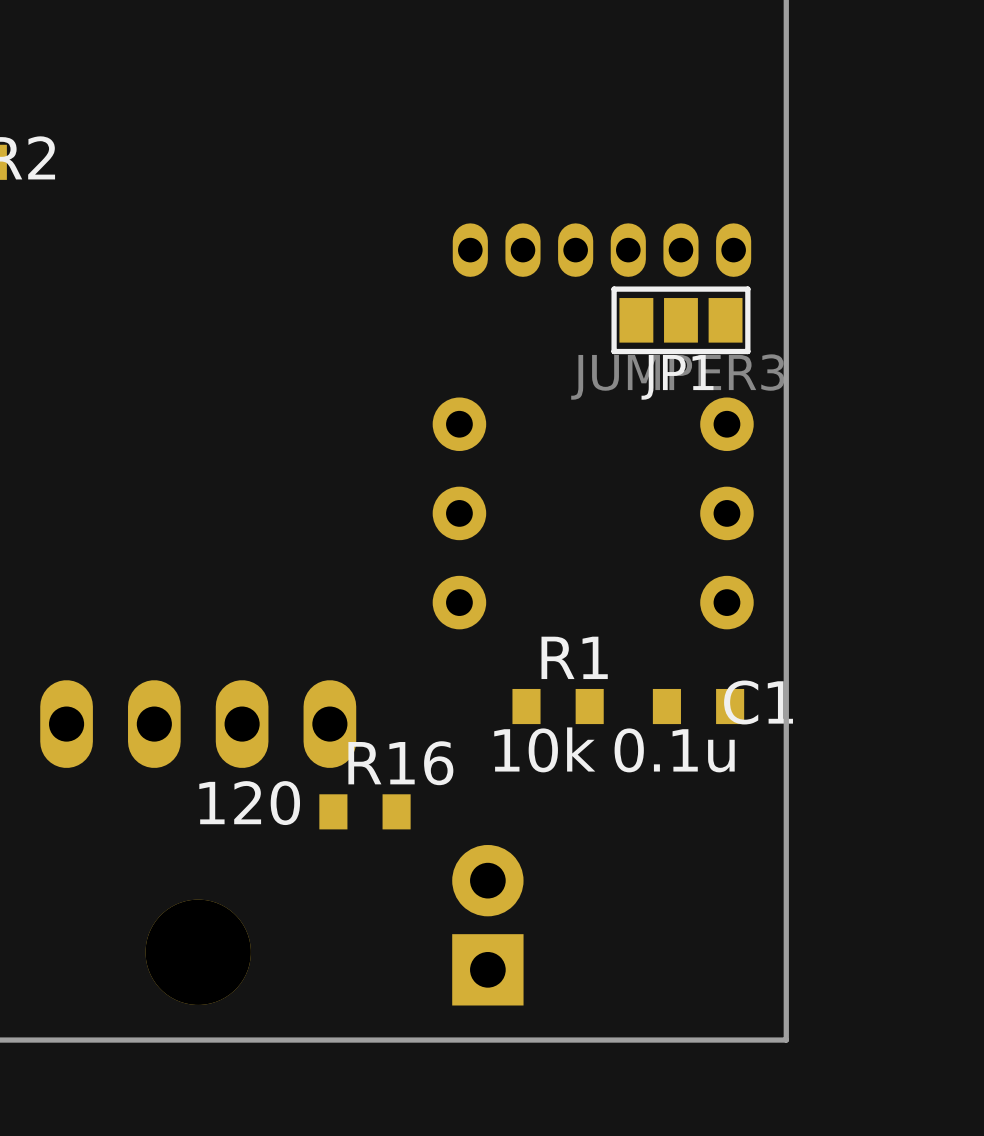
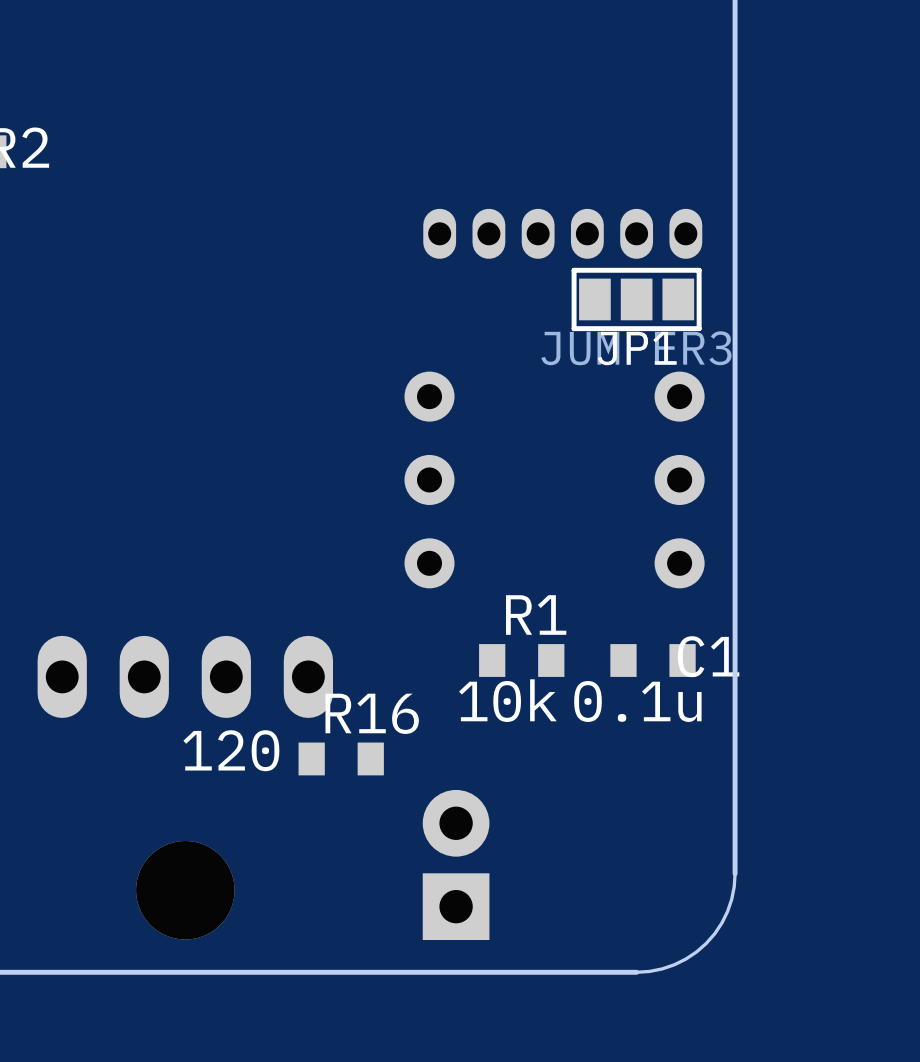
board edge: (786, 934) (786, 1040) (680, 1040) -> (735, 873) (731, 899) (727, 911) (721, 923) (706, 943) (685, 959) (674, 964) (649, 971) (636, 972)

